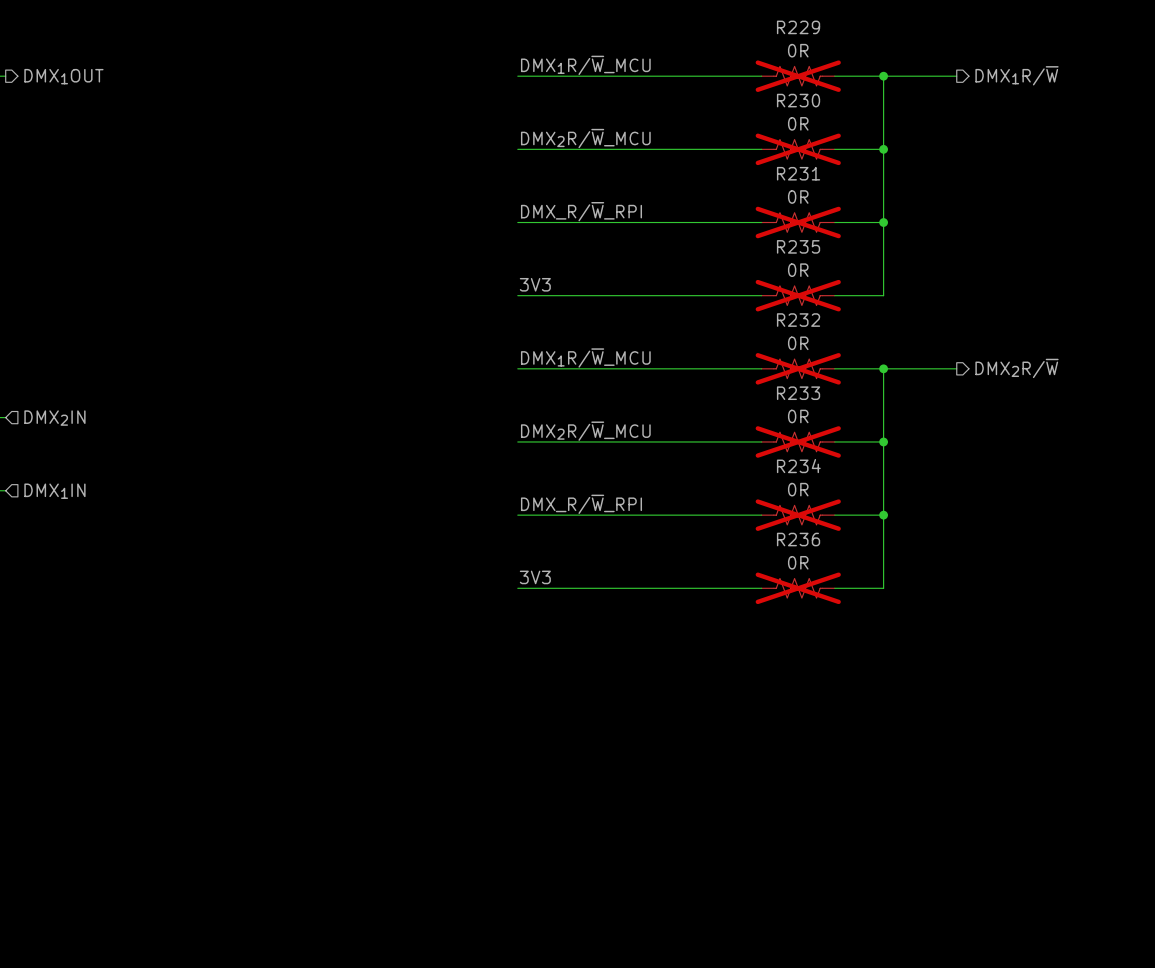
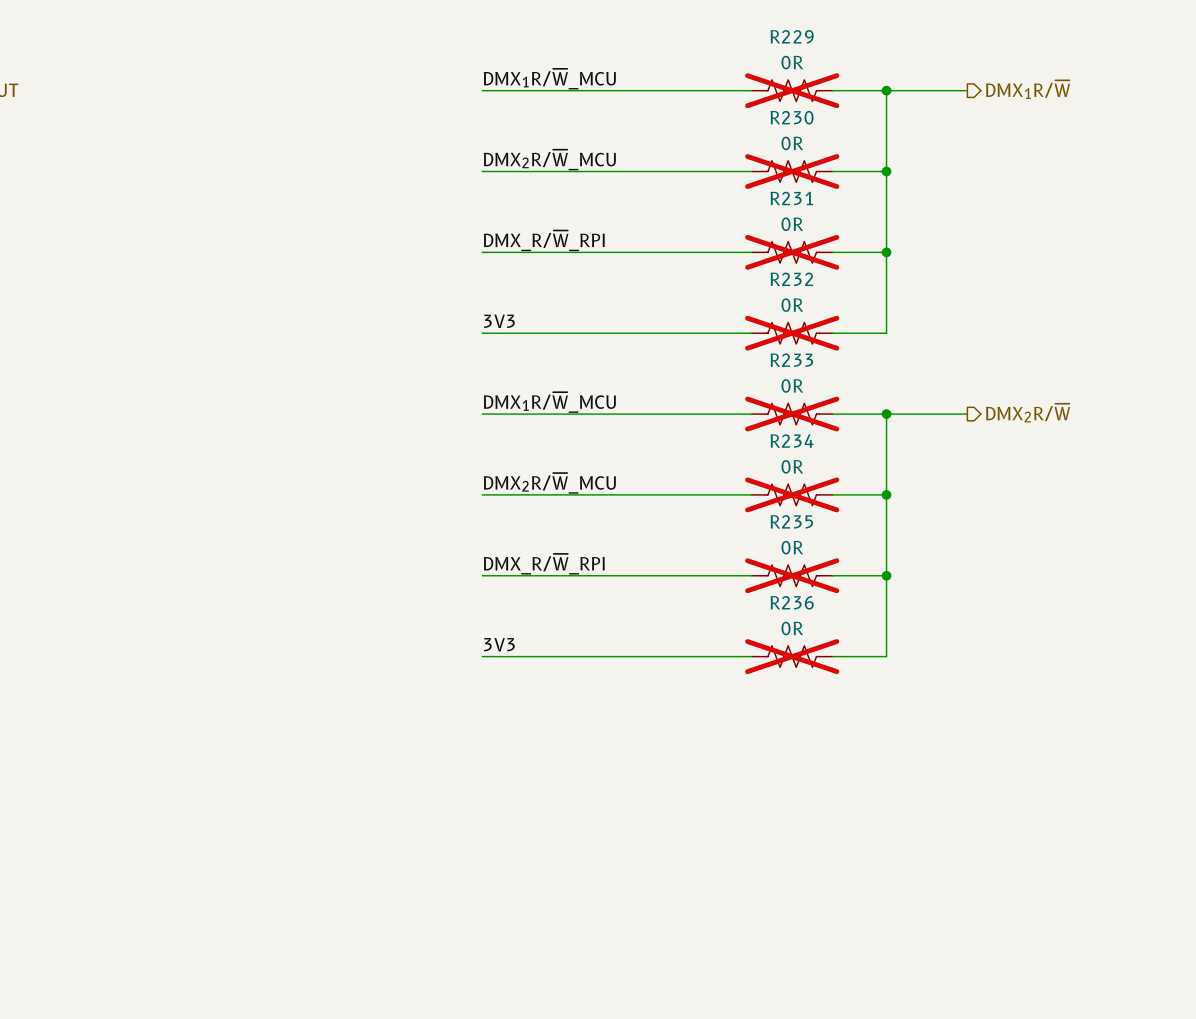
R235 name: R235 (798, 246) -> R232 (791, 279)
R232 name: R232 (798, 320) -> R233 (791, 360)
R233 name: R233 (798, 393) -> R234 (792, 441)
R234 name: R234 (798, 466) -> R235 (791, 521)

